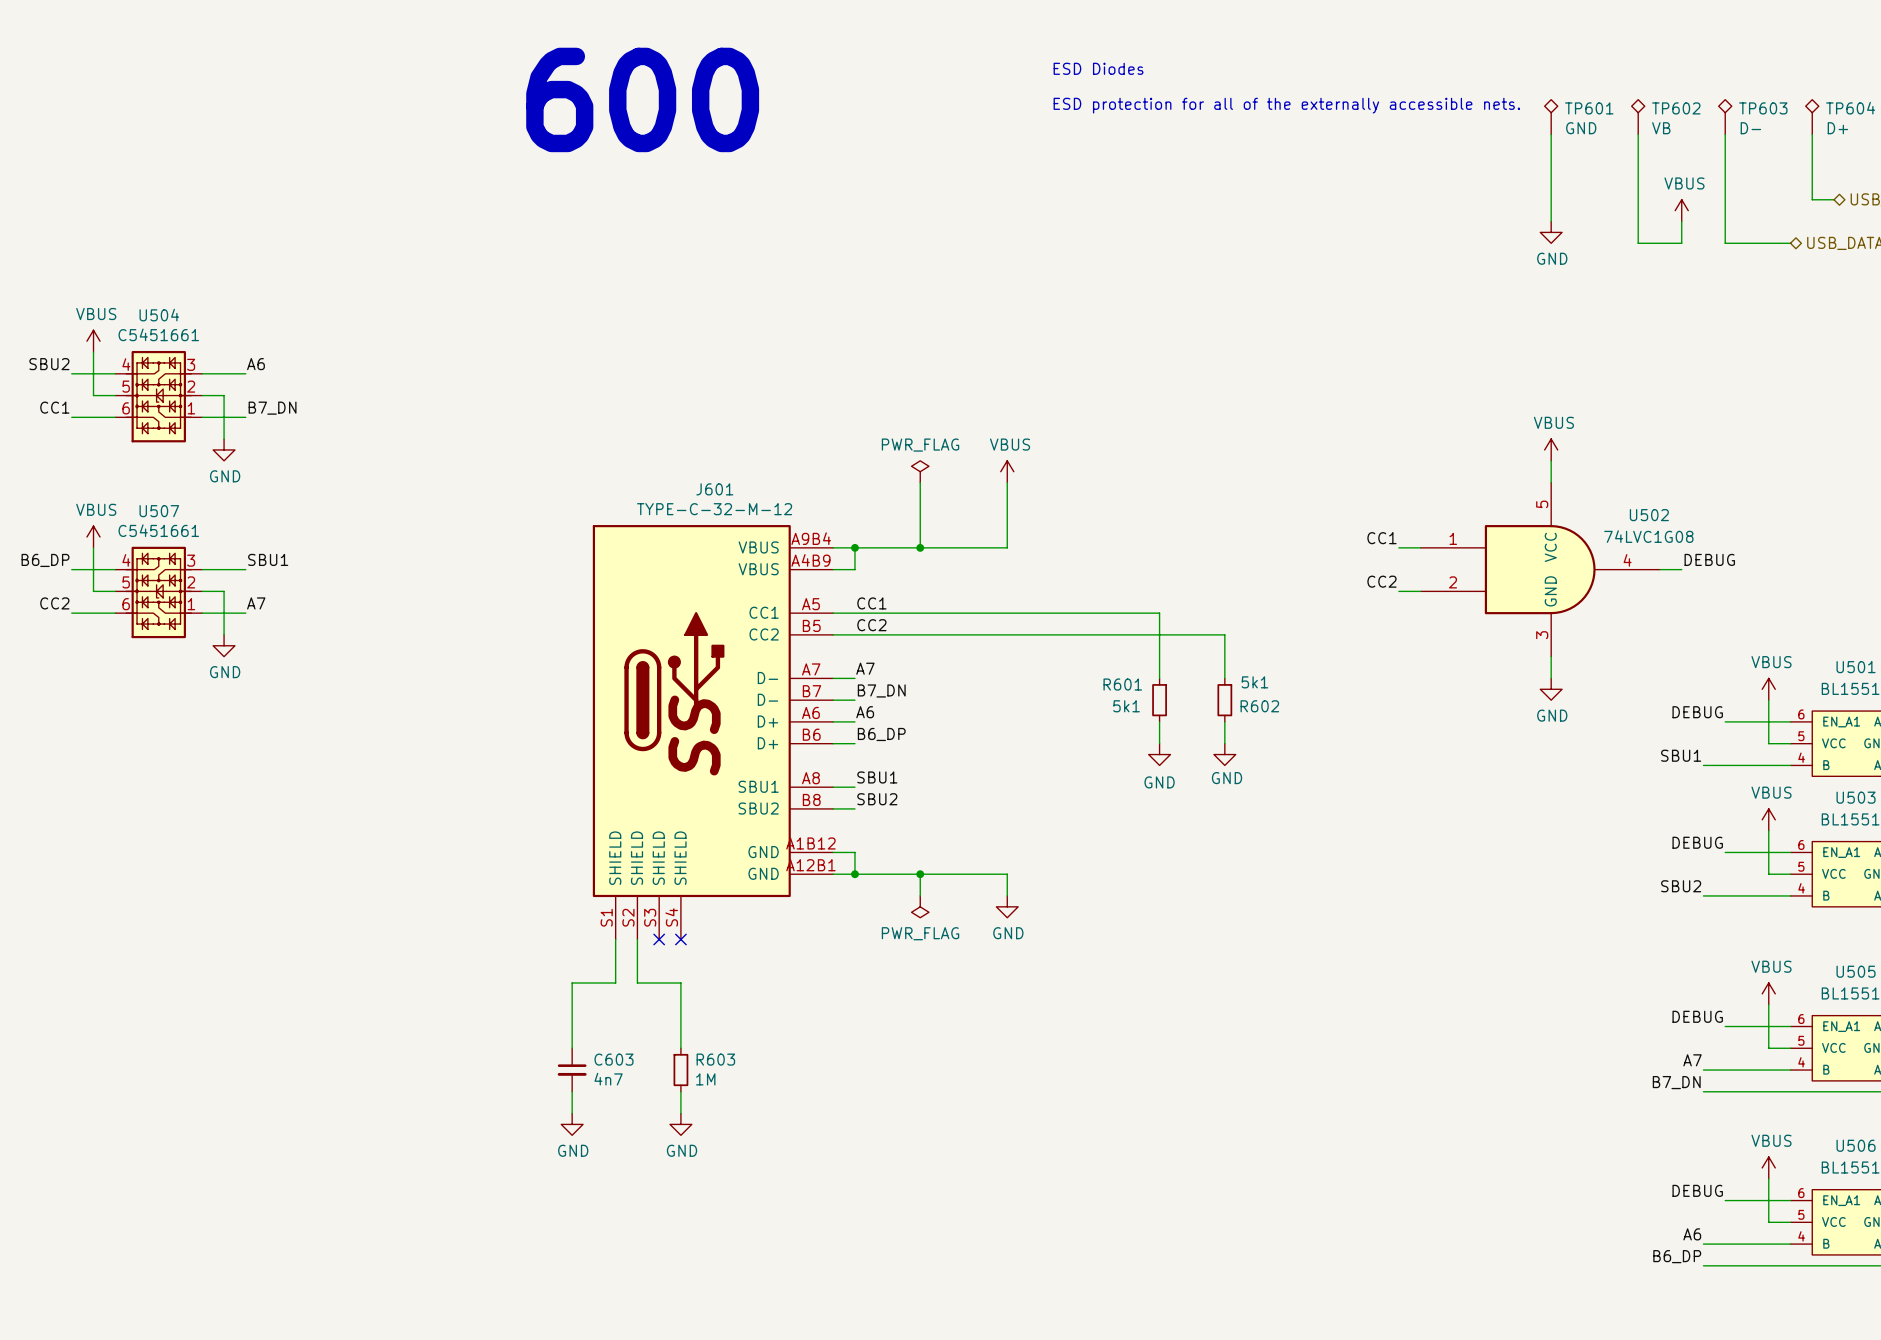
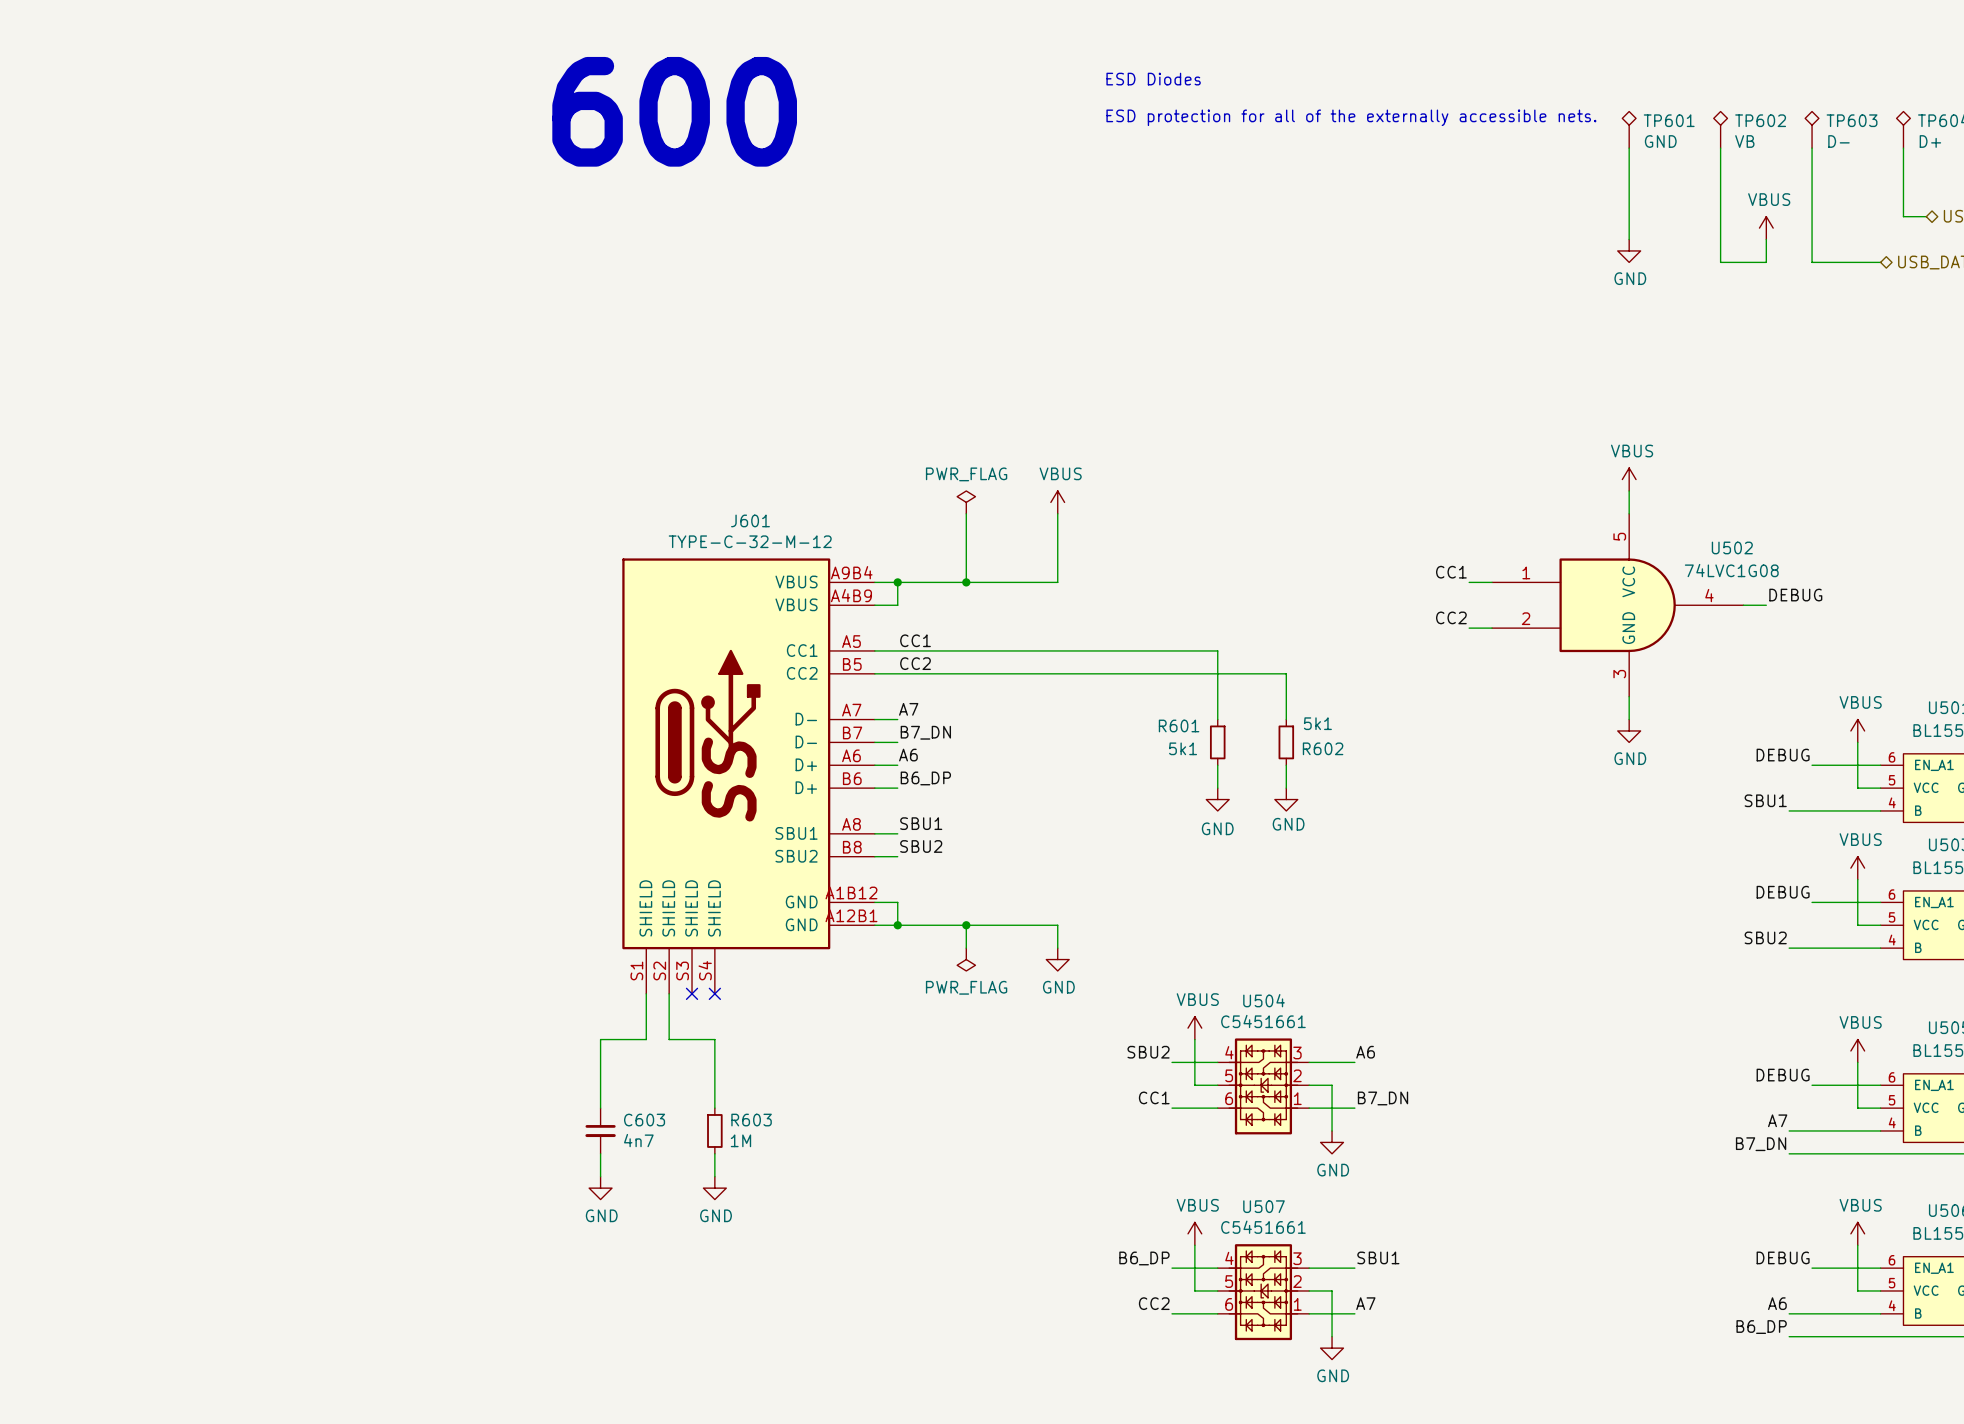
power symbol: VBUS (93, 341) -> none
wire: (93, 352) (93, 395) (115, 395) -> none
label: SBU2 (49, 364) -> none
label: A6 (255, 364) -> none
wire: (71, 373) (115, 373) -> none
wire: (202, 373) (245, 373) -> none
wire: (202, 395) (224, 395) (224, 439) -> none
U504 position: (158, 396) -> (1263, 1086)
label: CC1 (54, 407) -> none
label: B7_DN (272, 408) -> none
wire: (71, 417) (115, 417) -> none
wire: (202, 417) (245, 417) -> none
power symbol: GND (224, 449) -> none
power symbol: VBUS (93, 536) -> none
wire: (93, 547) (93, 591) (115, 591) -> none
label: SBU1 (268, 559) -> none
label: B6_DP (45, 560) -> none
wire: (71, 569) (115, 569) -> none
wire: (202, 569) (245, 569) -> none
wire: (202, 591) (224, 591) (224, 634) -> none
U507 position: (158, 592) -> (1263, 1292)
label: CC2 (54, 603) -> none
label: A7 (256, 603) -> none
wire: (71, 613) (115, 613) -> none
wire: (202, 613) (245, 613) -> none
power symbol: GND (224, 645) -> none
power symbol: none -> VBUS (1194, 1028)
wire: none -> (1194, 1039) (1194, 1085) (1217, 1085)
label: none -> SBU2 (1148, 1052)
label: none -> A6 (1365, 1052)
wire: none -> (1172, 1062) (1217, 1062)
wire: none -> (1309, 1062) (1354, 1062)
wire: none -> (1309, 1085) (1332, 1085) (1332, 1130)
label: none -> CC1 (1154, 1097)
label: none -> B7_DN (1382, 1098)
wire: none -> (1172, 1108) (1217, 1108)
wire: none -> (1309, 1108) (1354, 1108)
power symbol: none -> GND (1332, 1142)
power symbol: none -> VBUS (1194, 1233)
wire: none -> (1194, 1245) (1194, 1290) (1217, 1290)
label: none -> SBU1 (1378, 1257)
label: none -> B6_DP (1144, 1258)
wire: none -> (1172, 1268) (1217, 1268)
wire: none -> (1309, 1268) (1354, 1268)
wire: none -> (1309, 1290) (1332, 1290) (1332, 1336)
label: none -> CC2 (1154, 1303)
label: none -> A7 (1365, 1303)
wire: none -> (1172, 1313) (1217, 1313)
wire: none -> (1309, 1313) (1354, 1313)
power symbol: none -> GND (1332, 1348)

